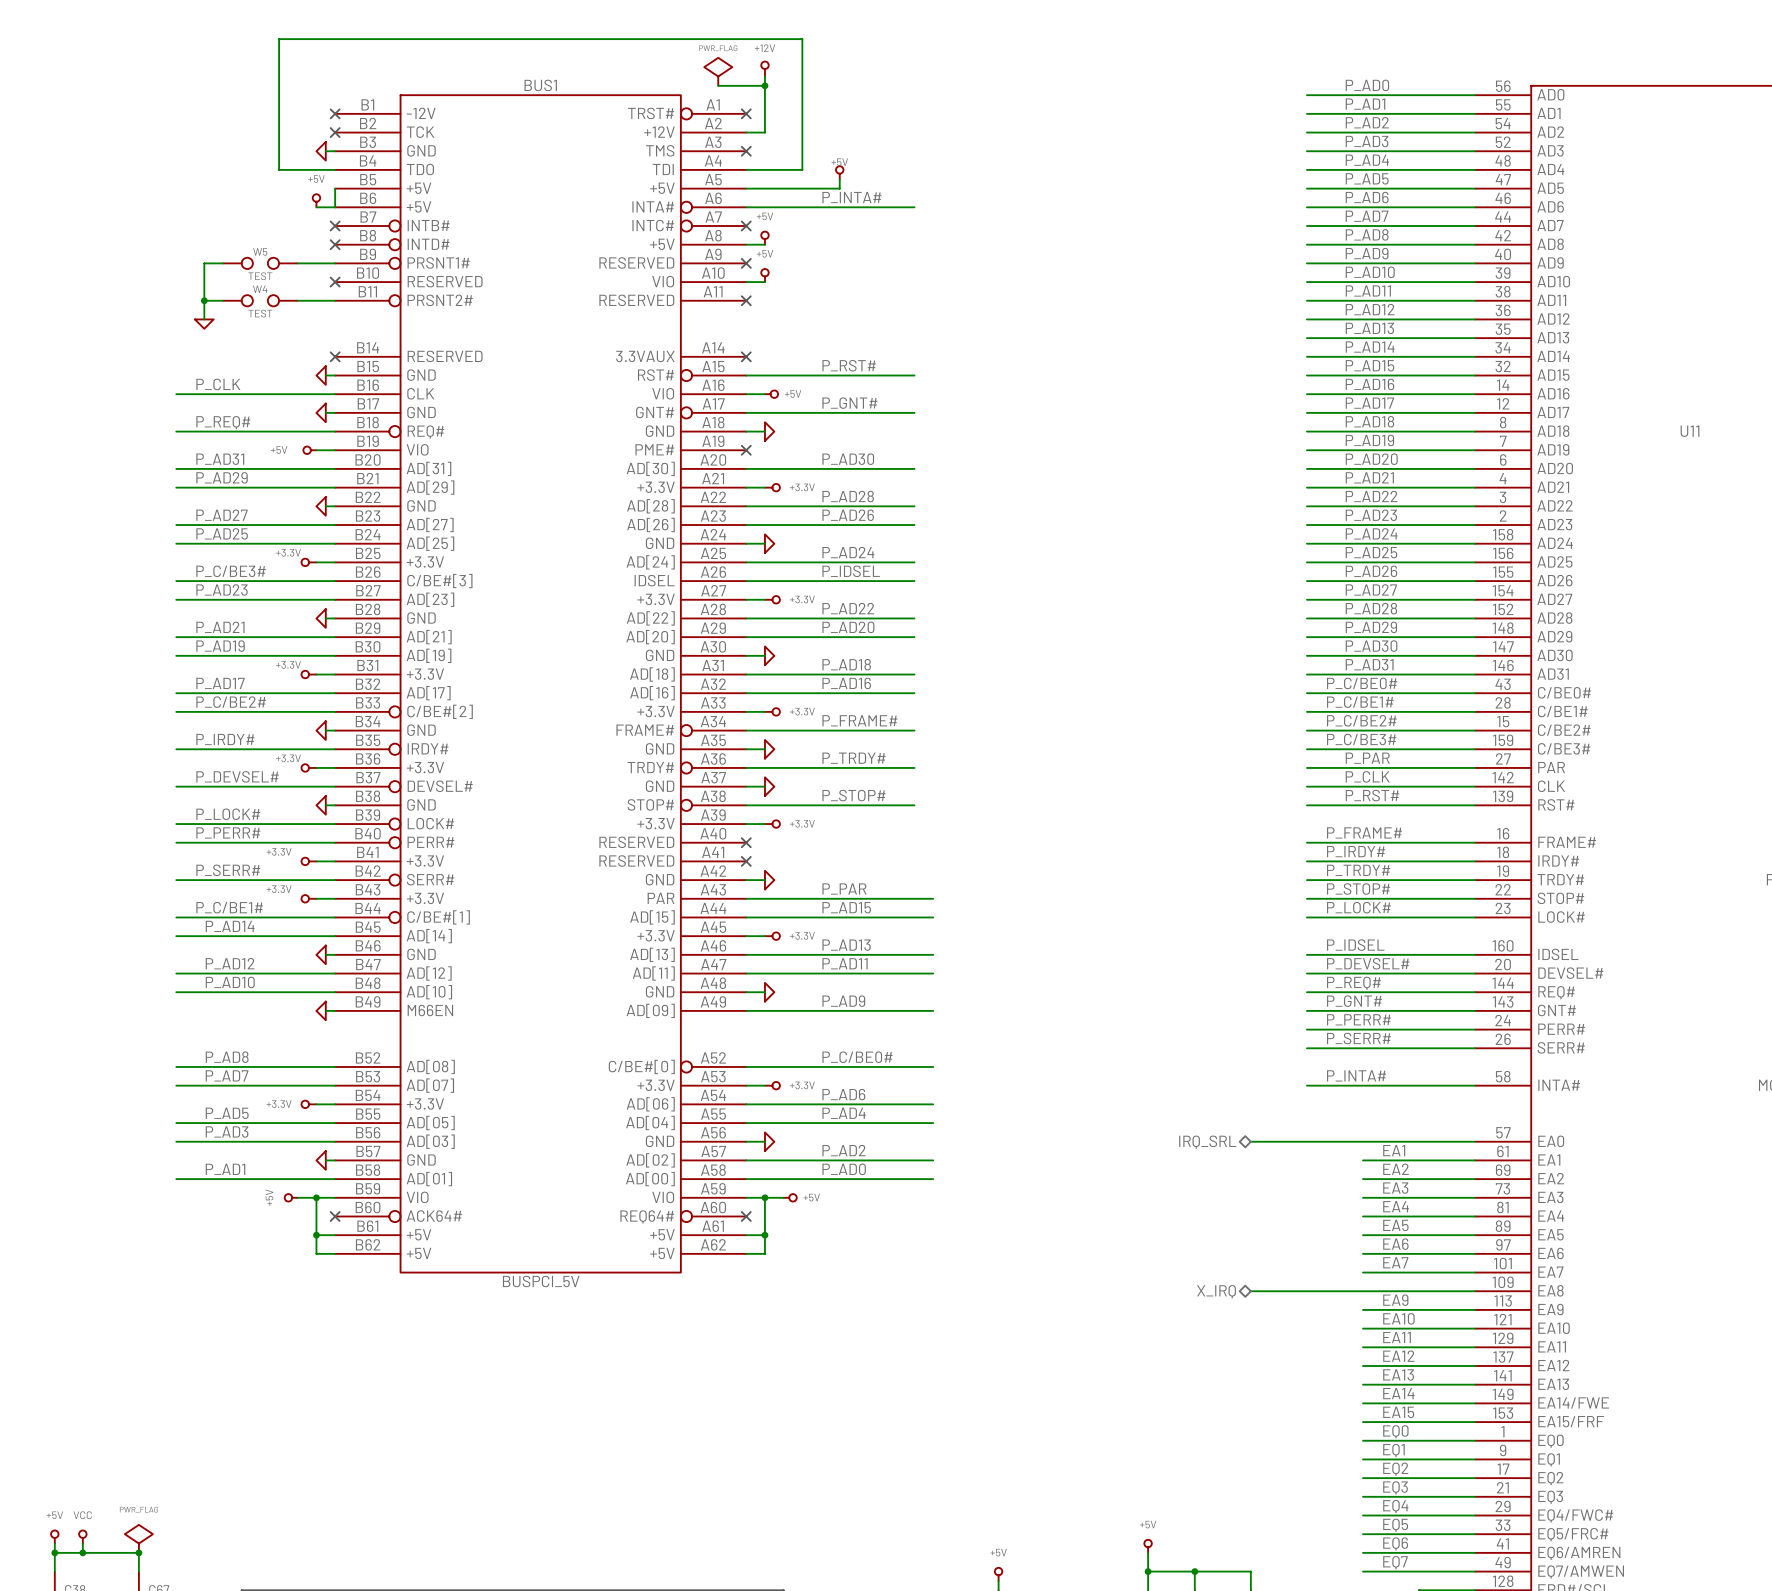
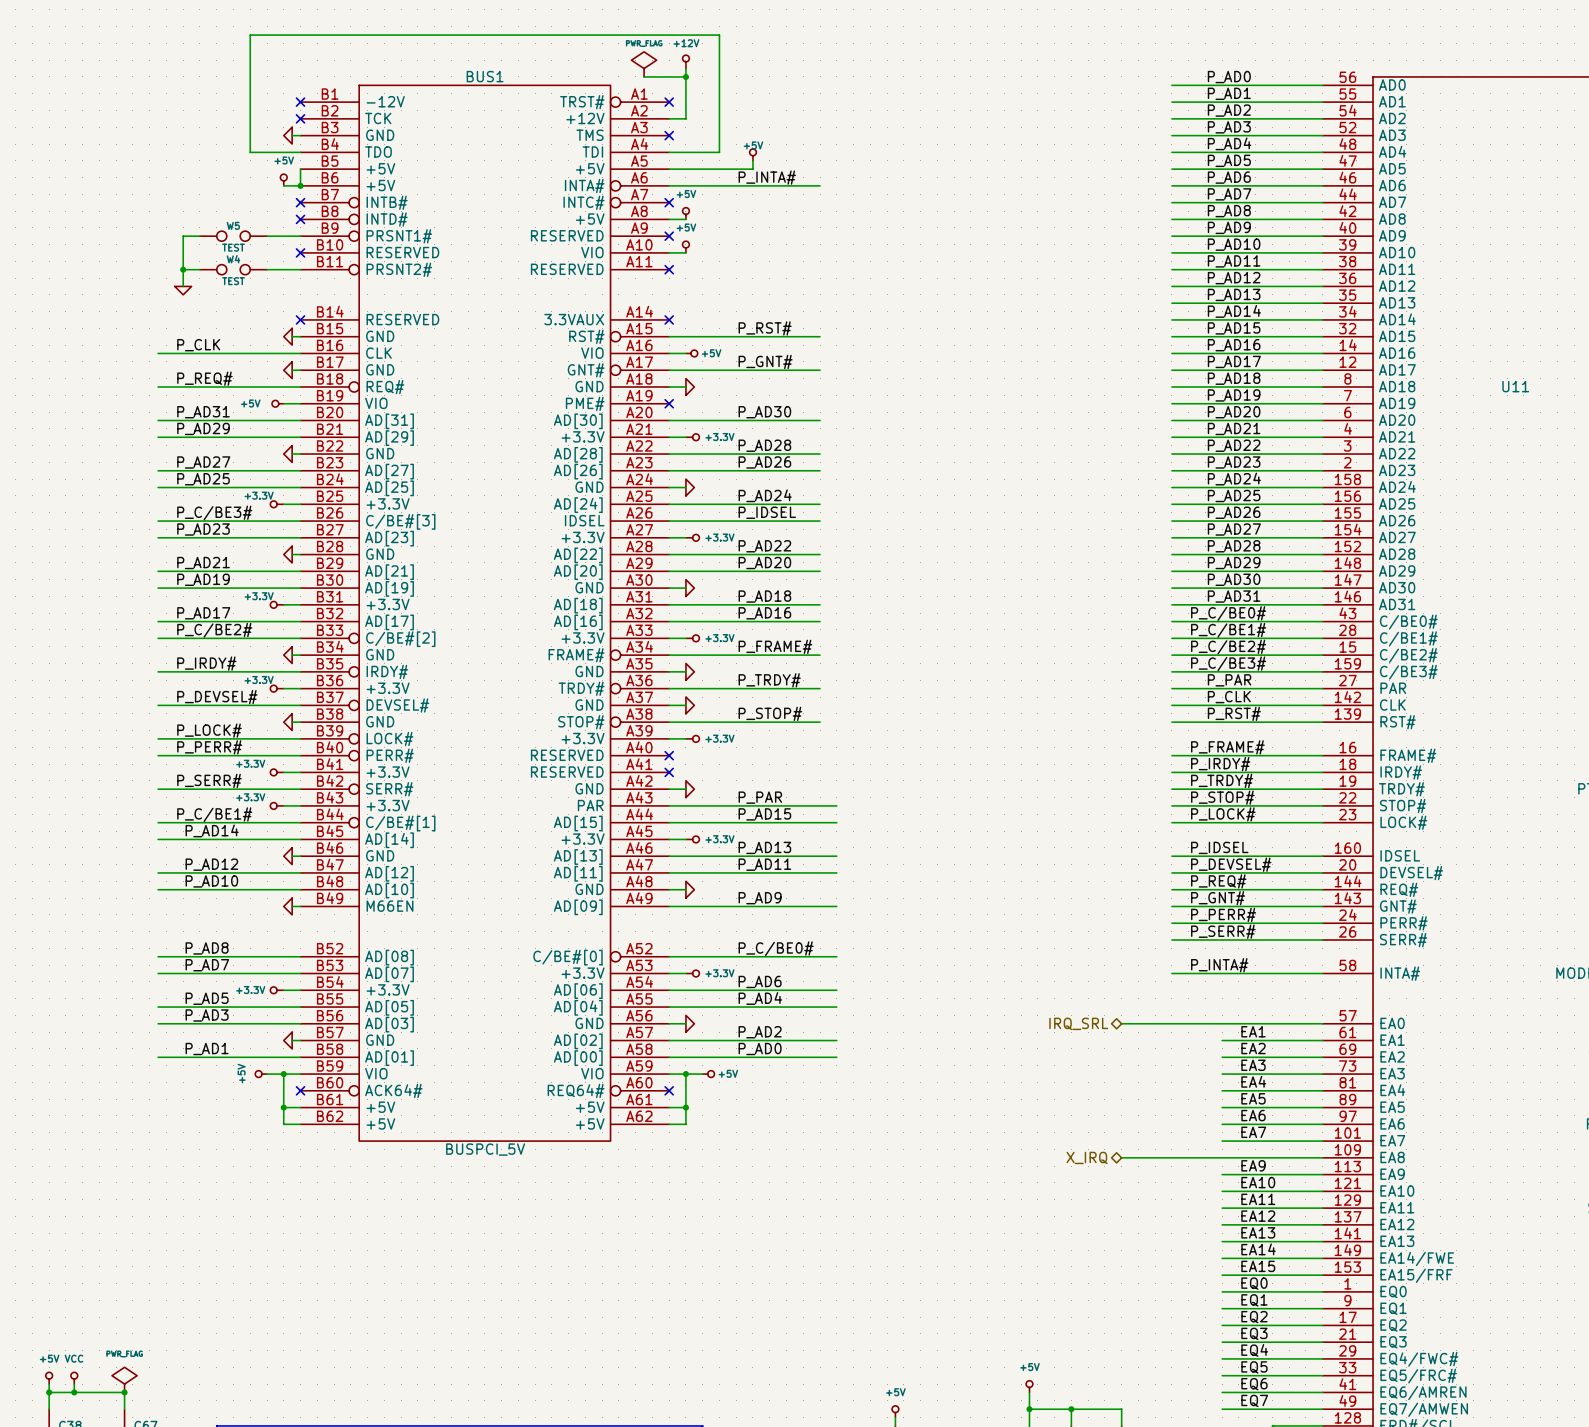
junction: none -> (300, 185)

